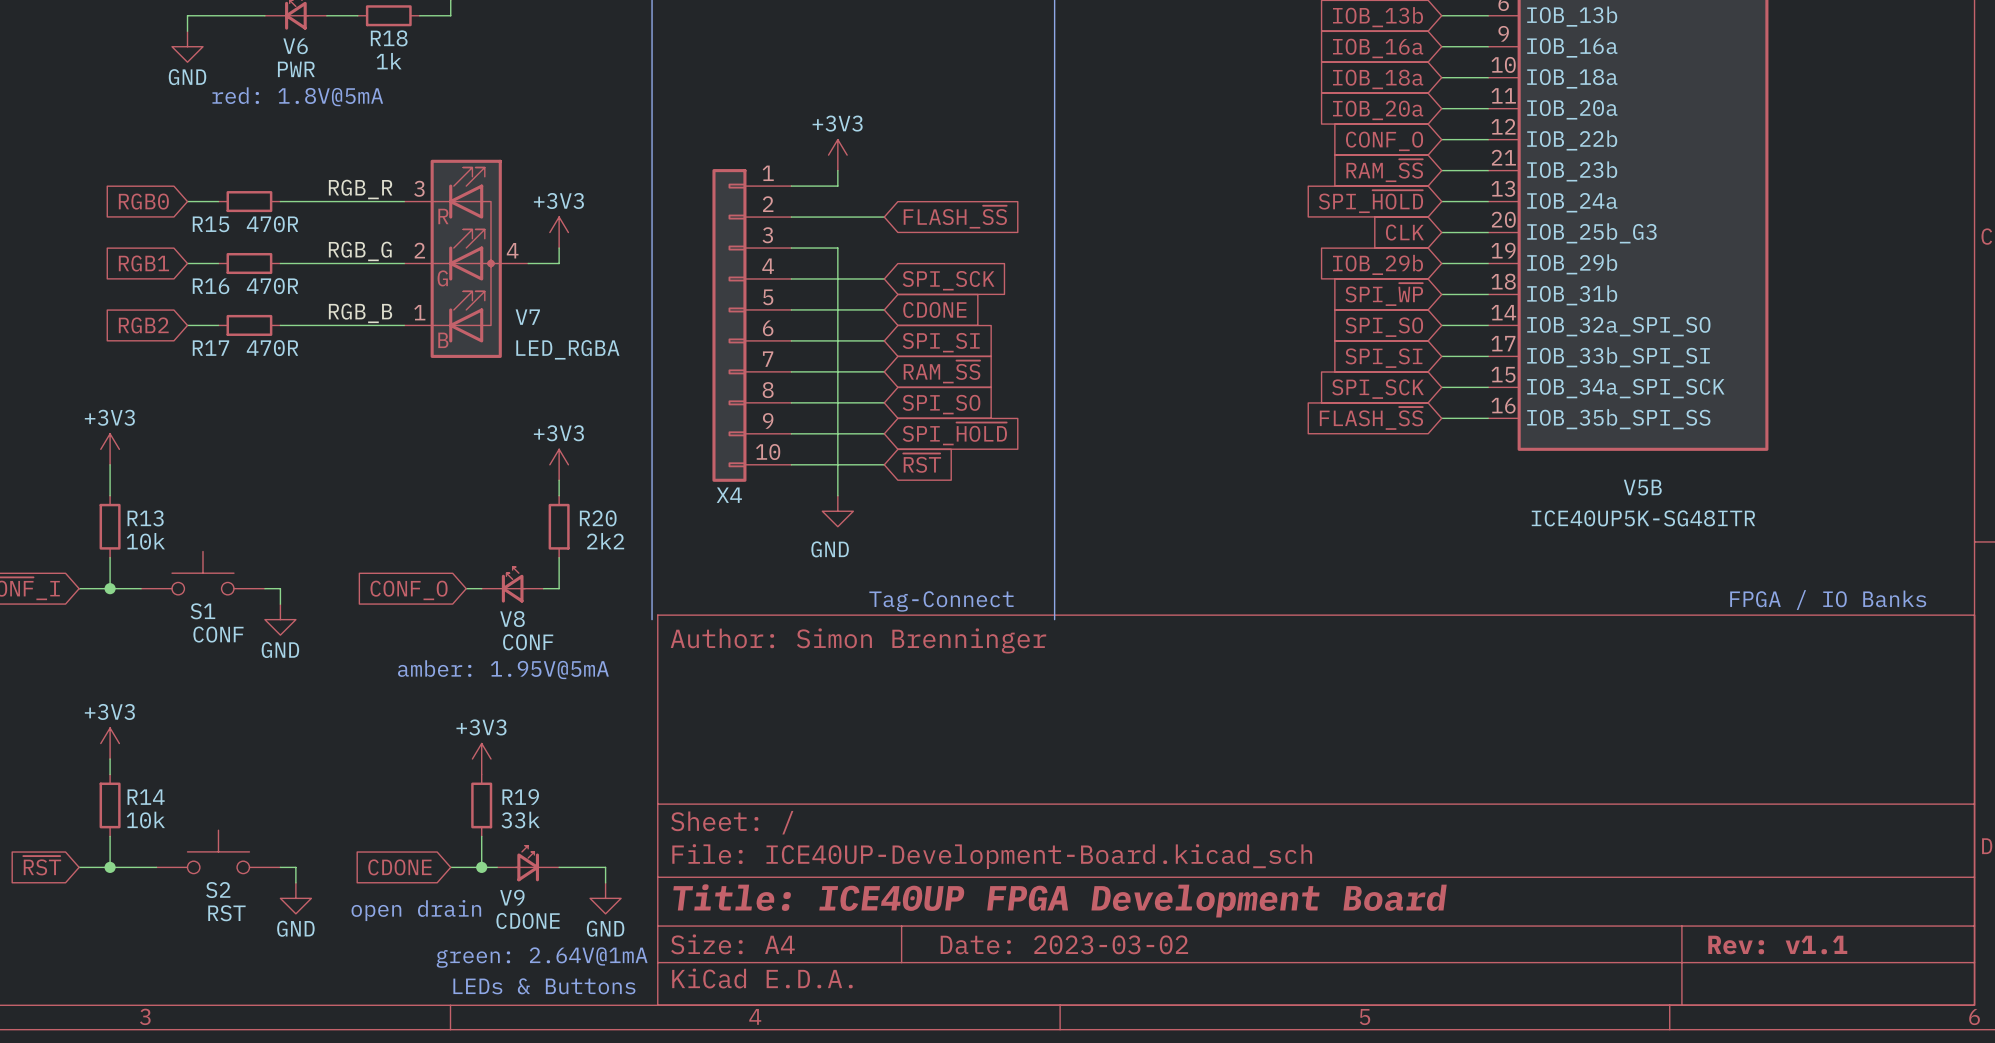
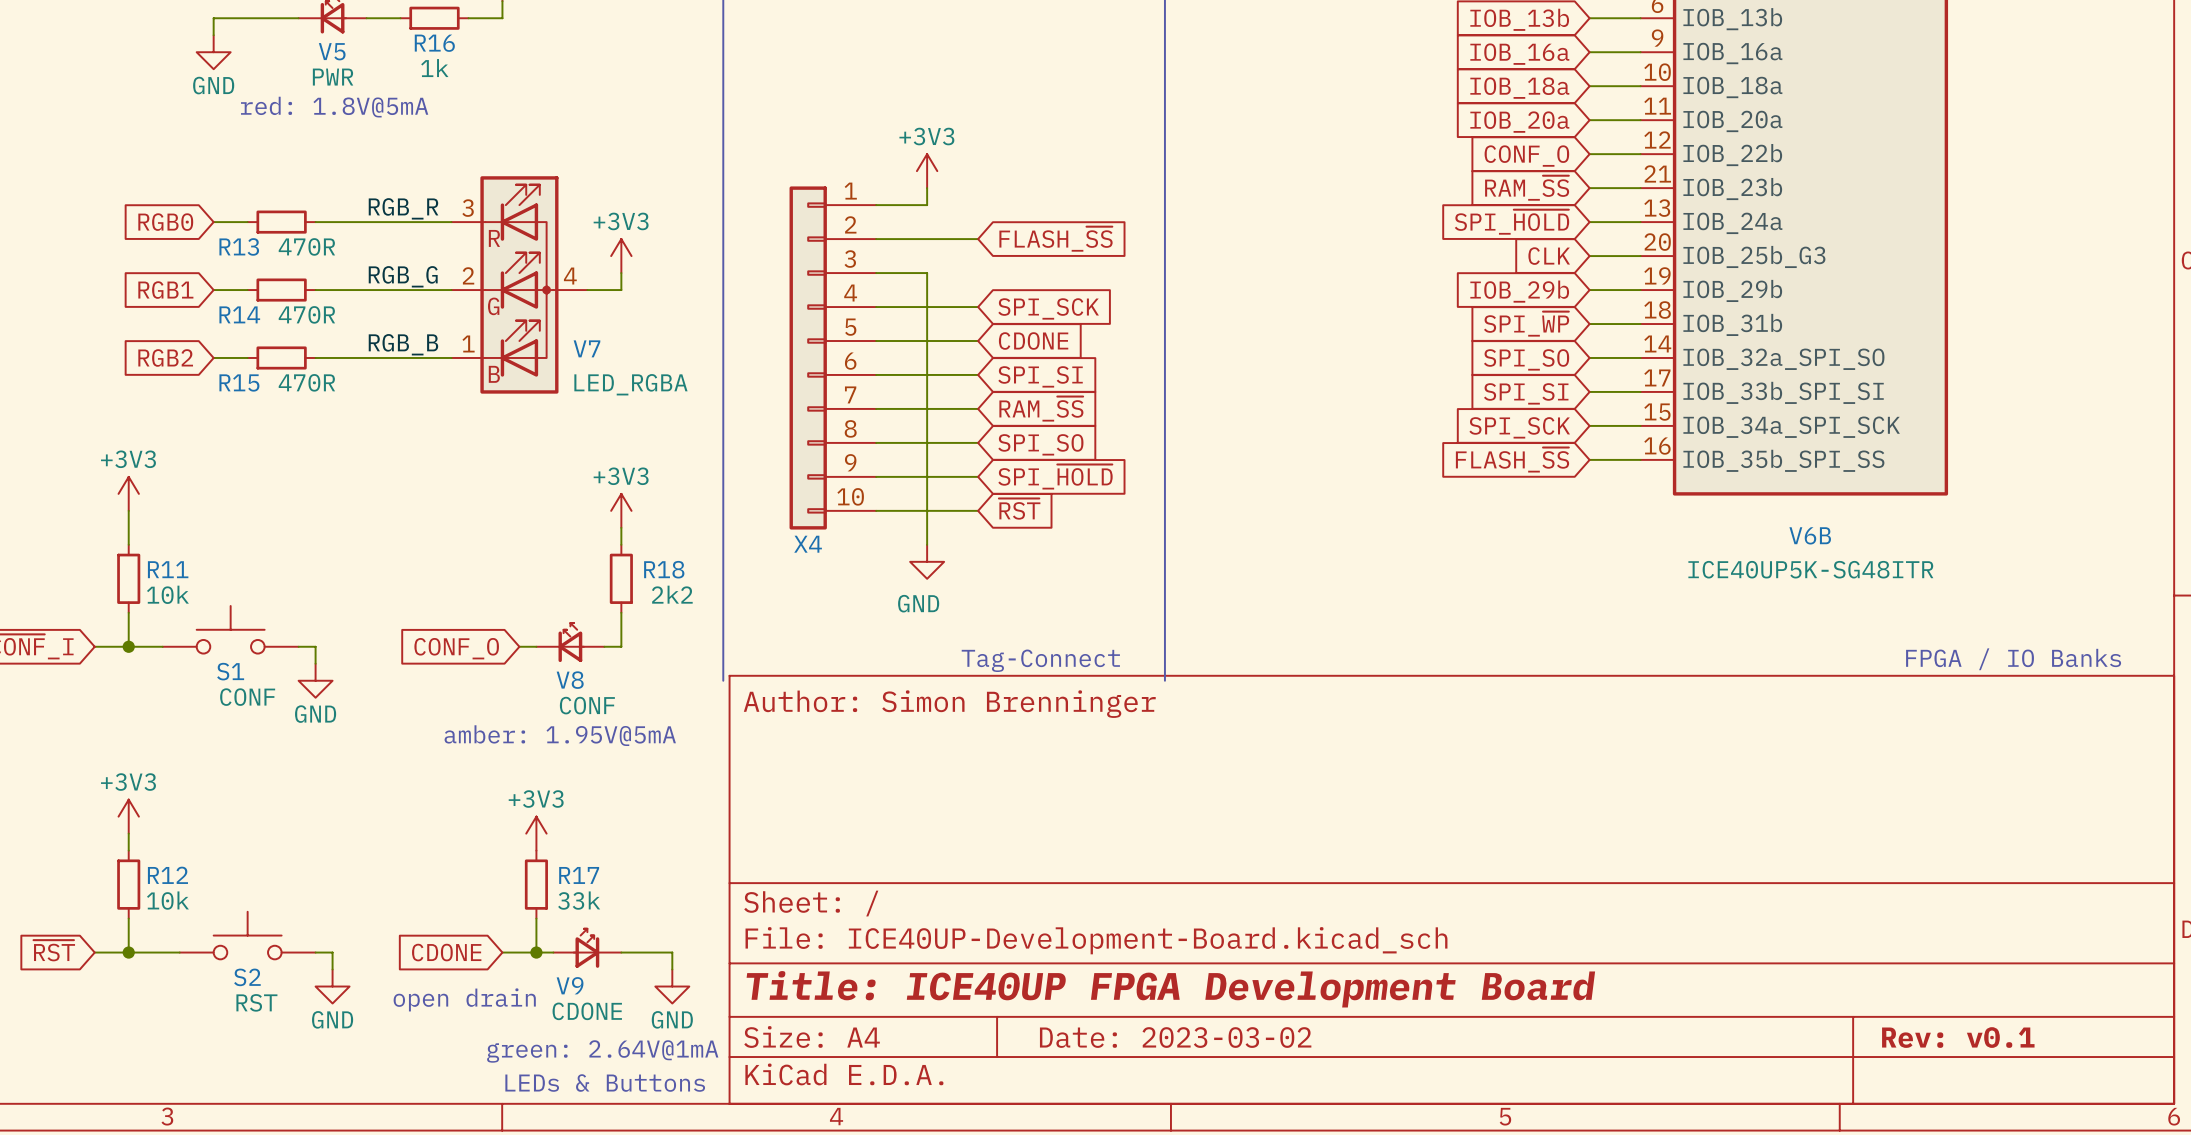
R18 name: R18 (389, 38) -> R16 (434, 43)
V6 name: V6 (295, 46) -> V5 (332, 51)
R15 name: R15 (210, 224) -> R13 (239, 246)
R16 name: R16 (211, 286) -> R14 (239, 314)
R17 name: R17 (210, 348) -> R15 (239, 382)
V5B name: V5B (1642, 487) -> V6B (1810, 535)
R13 name: R13 (145, 518) -> R11 (168, 569)
R20 name: R20 (598, 518) -> R18 (664, 569)
R14 name: R14 (146, 797) -> R12 (167, 875)
R19 name: R19 (520, 797) -> R17 (579, 875)
title block: Rev: v1.1 (1777, 945) -> Rev: v0.1 (1958, 1037)

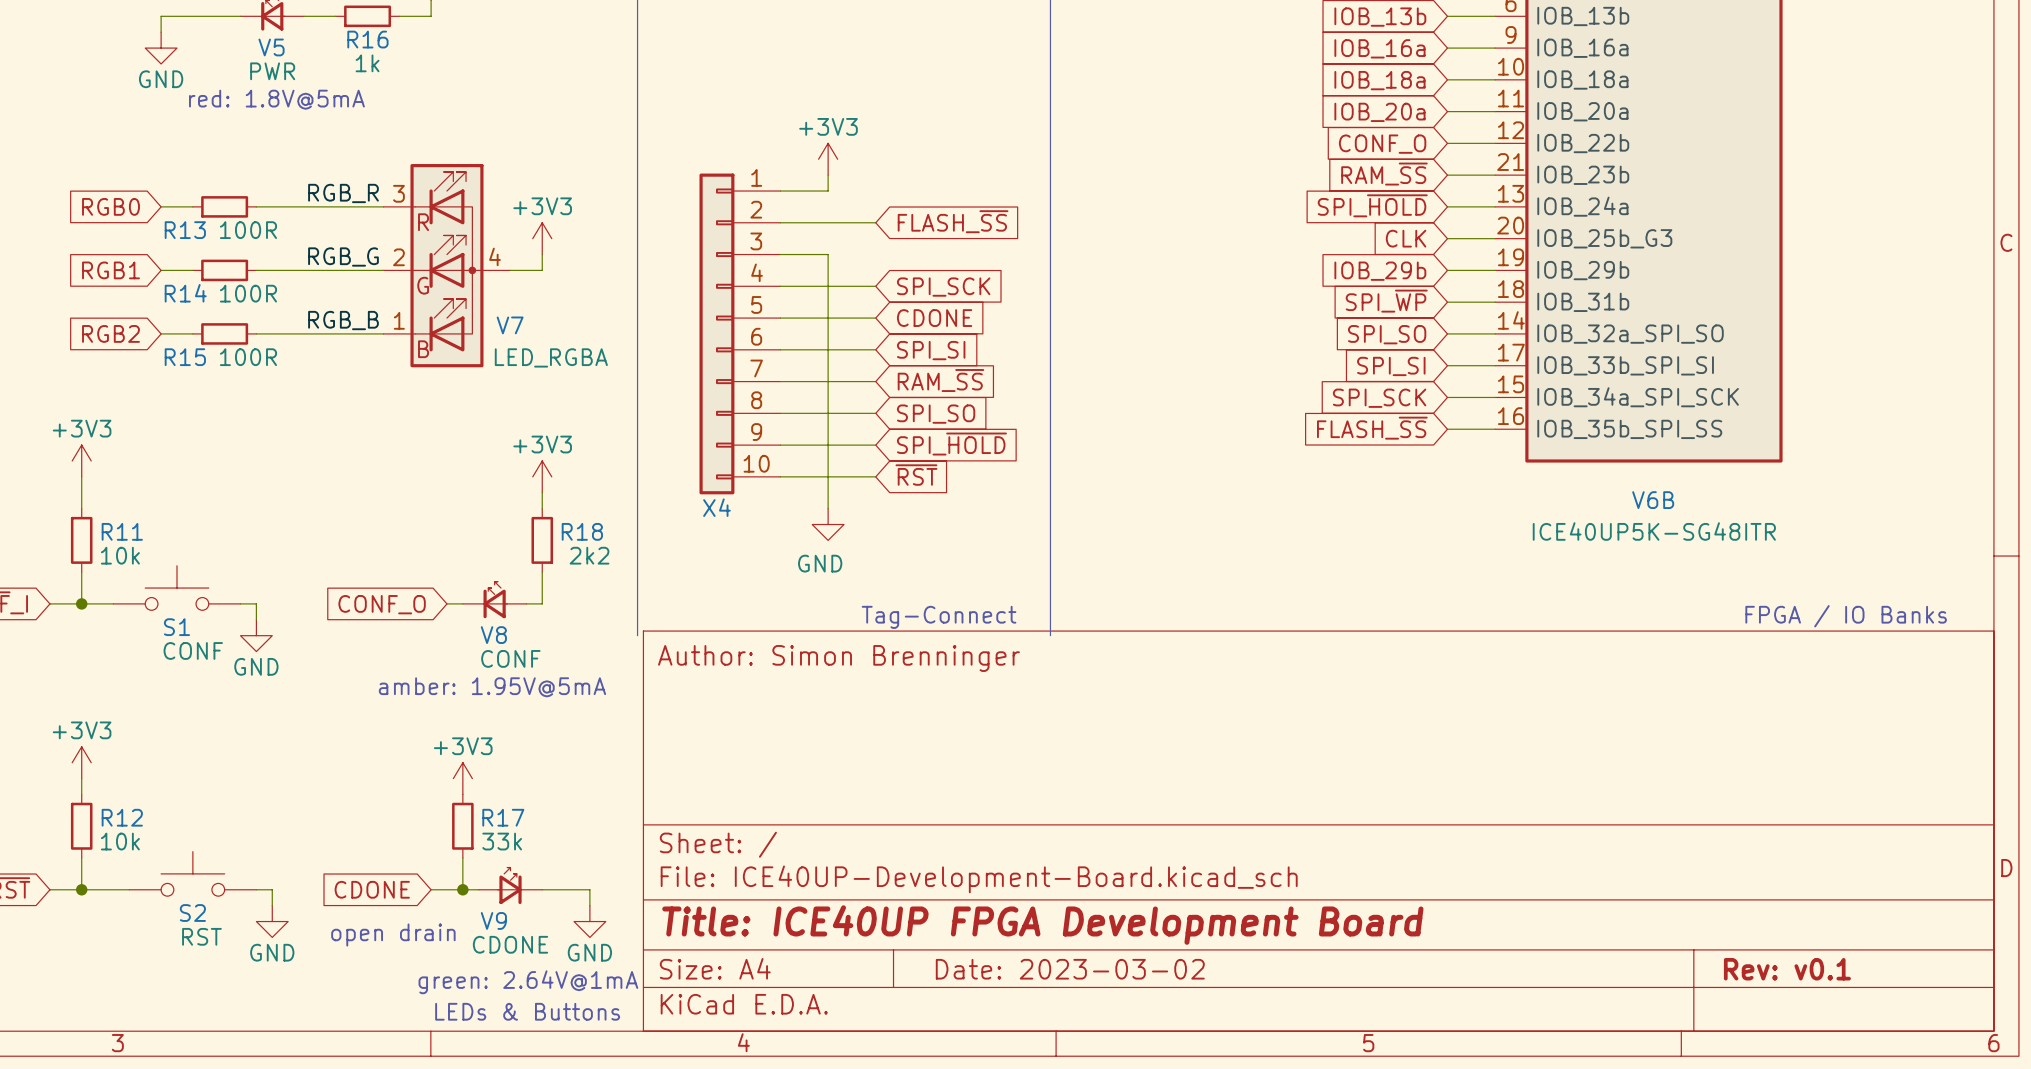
R13 value: 470R (306, 246) -> 100R (248, 230)
R14 value: 470R (306, 314) -> 100R (248, 293)
R15 value: 470R (306, 382) -> 100R (248, 357)

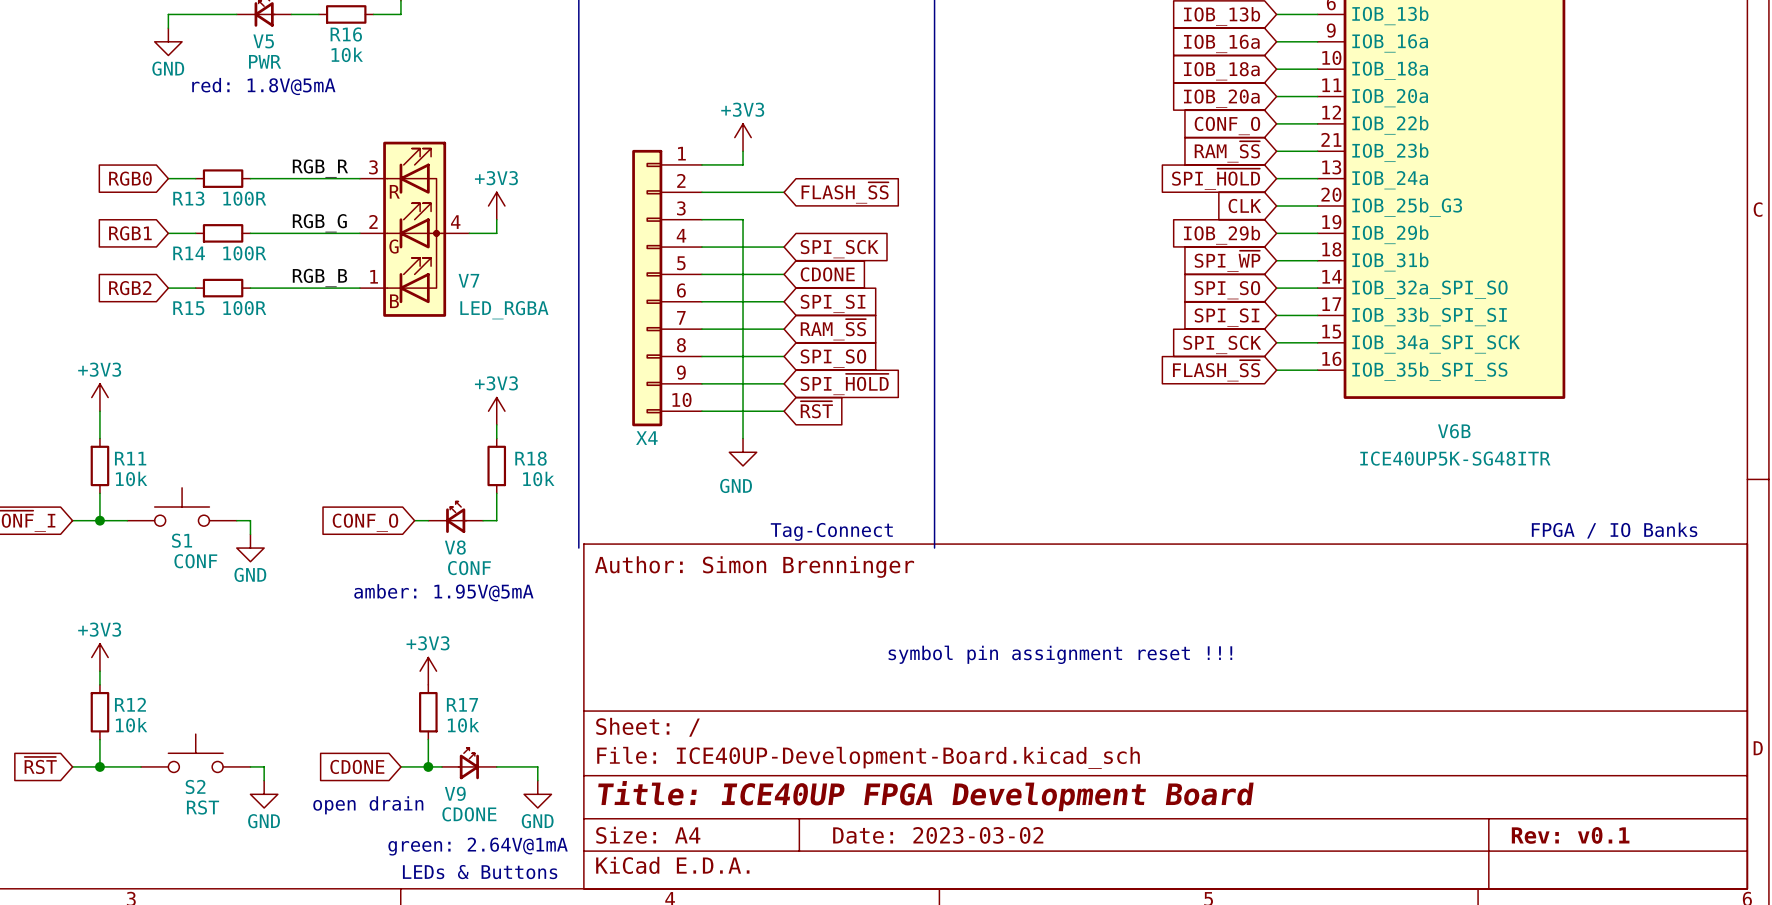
R16 value: 1k (367, 63) -> 10k (347, 54)
R18 value: 2k2 (589, 555) -> 10k (538, 478)
text: none -> symbol pin assignment reset !!! (1060, 654)
R17 value: 33k (502, 841) -> 10k (463, 725)

